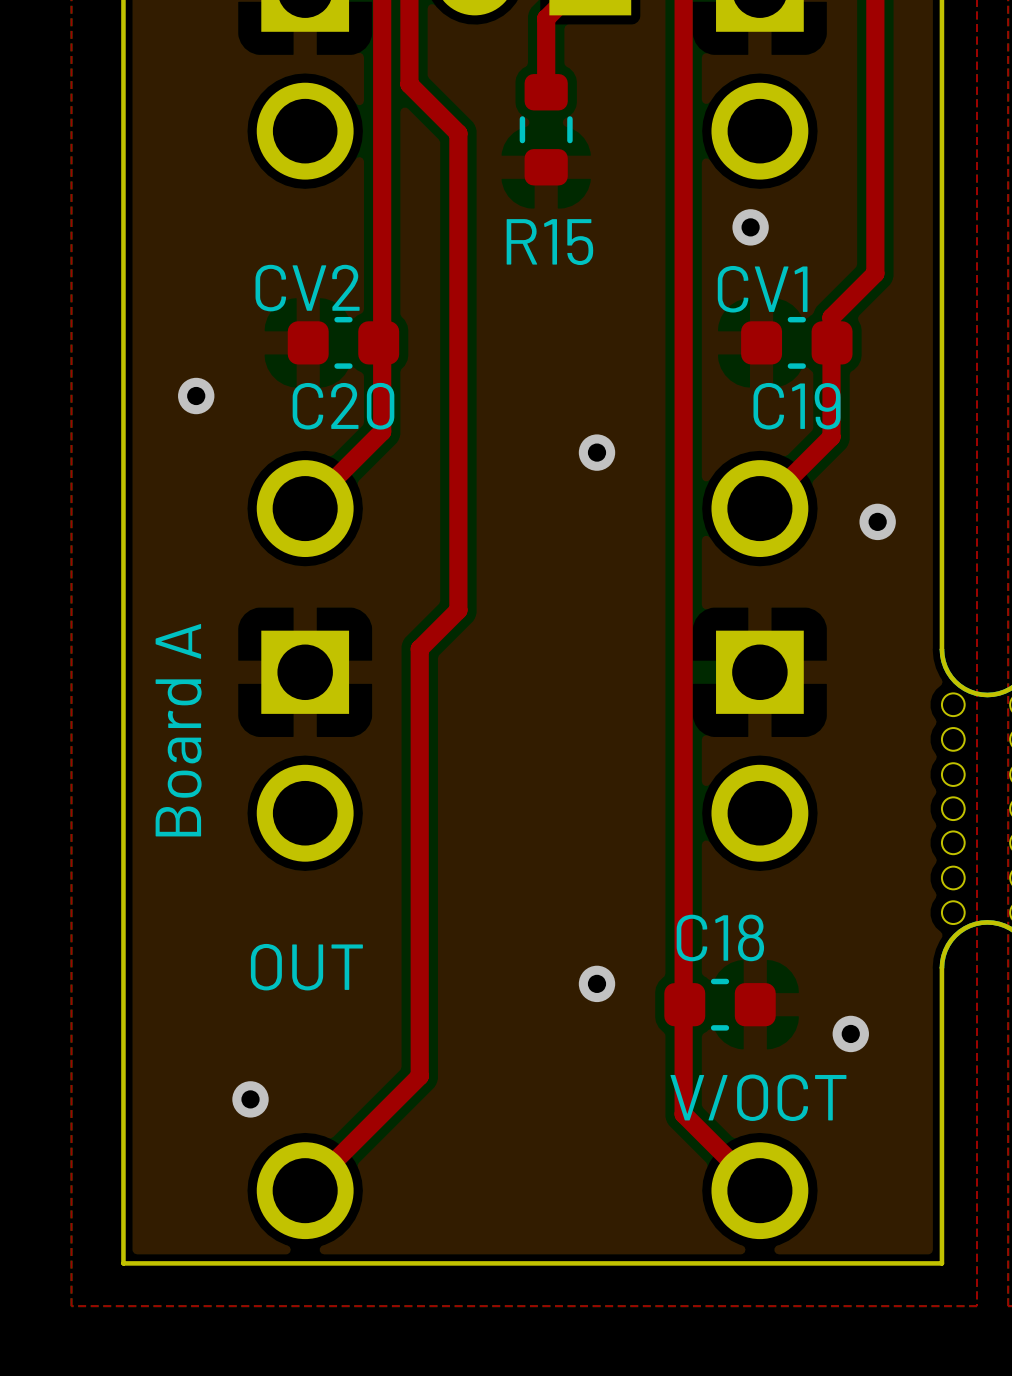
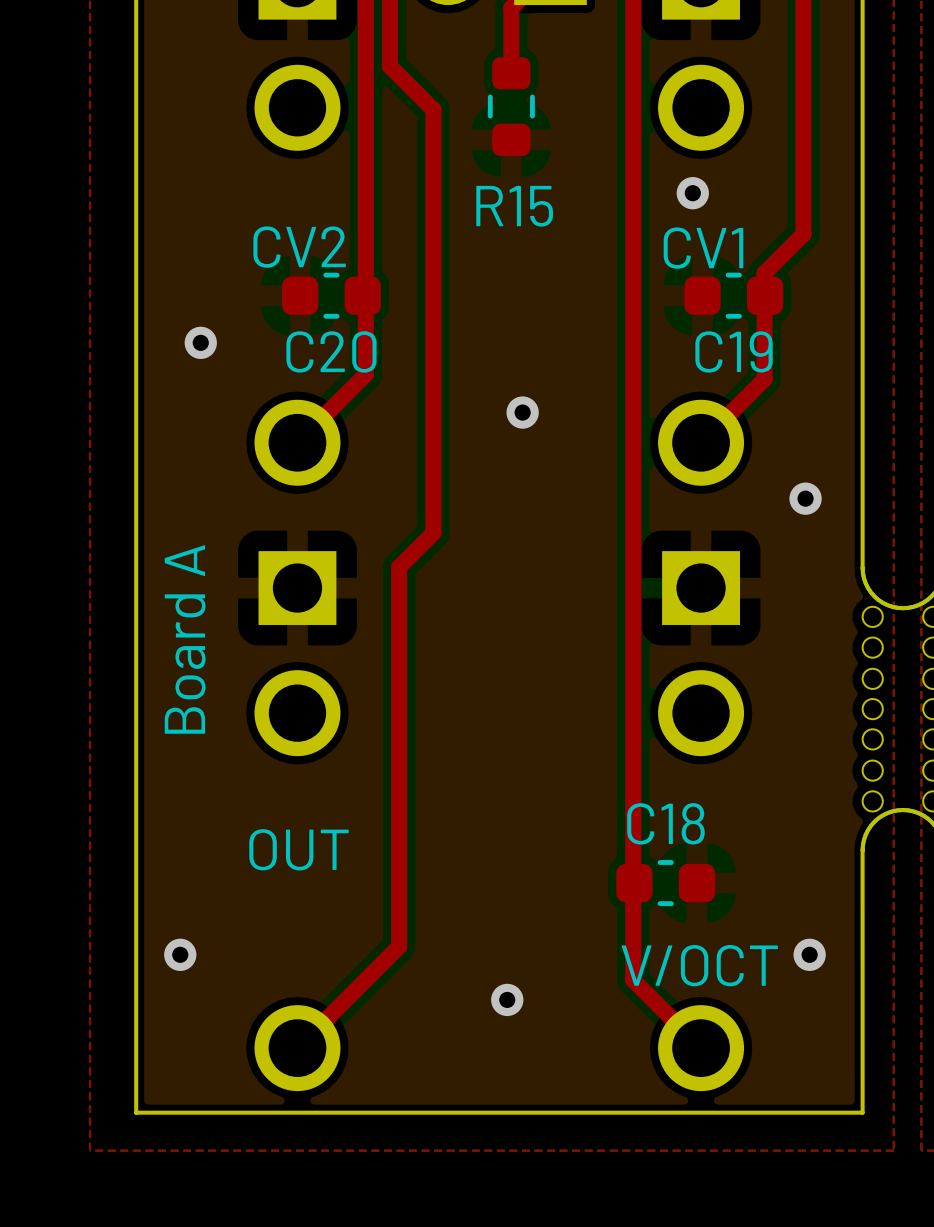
via position: (597, 452) -> (522, 412)
via position: (877, 521) -> (805, 498)
via: (597, 983) -> none
via position: (850, 1033) -> (809, 954)
via position: (250, 1099) -> (180, 954)
via: none -> (507, 999)

